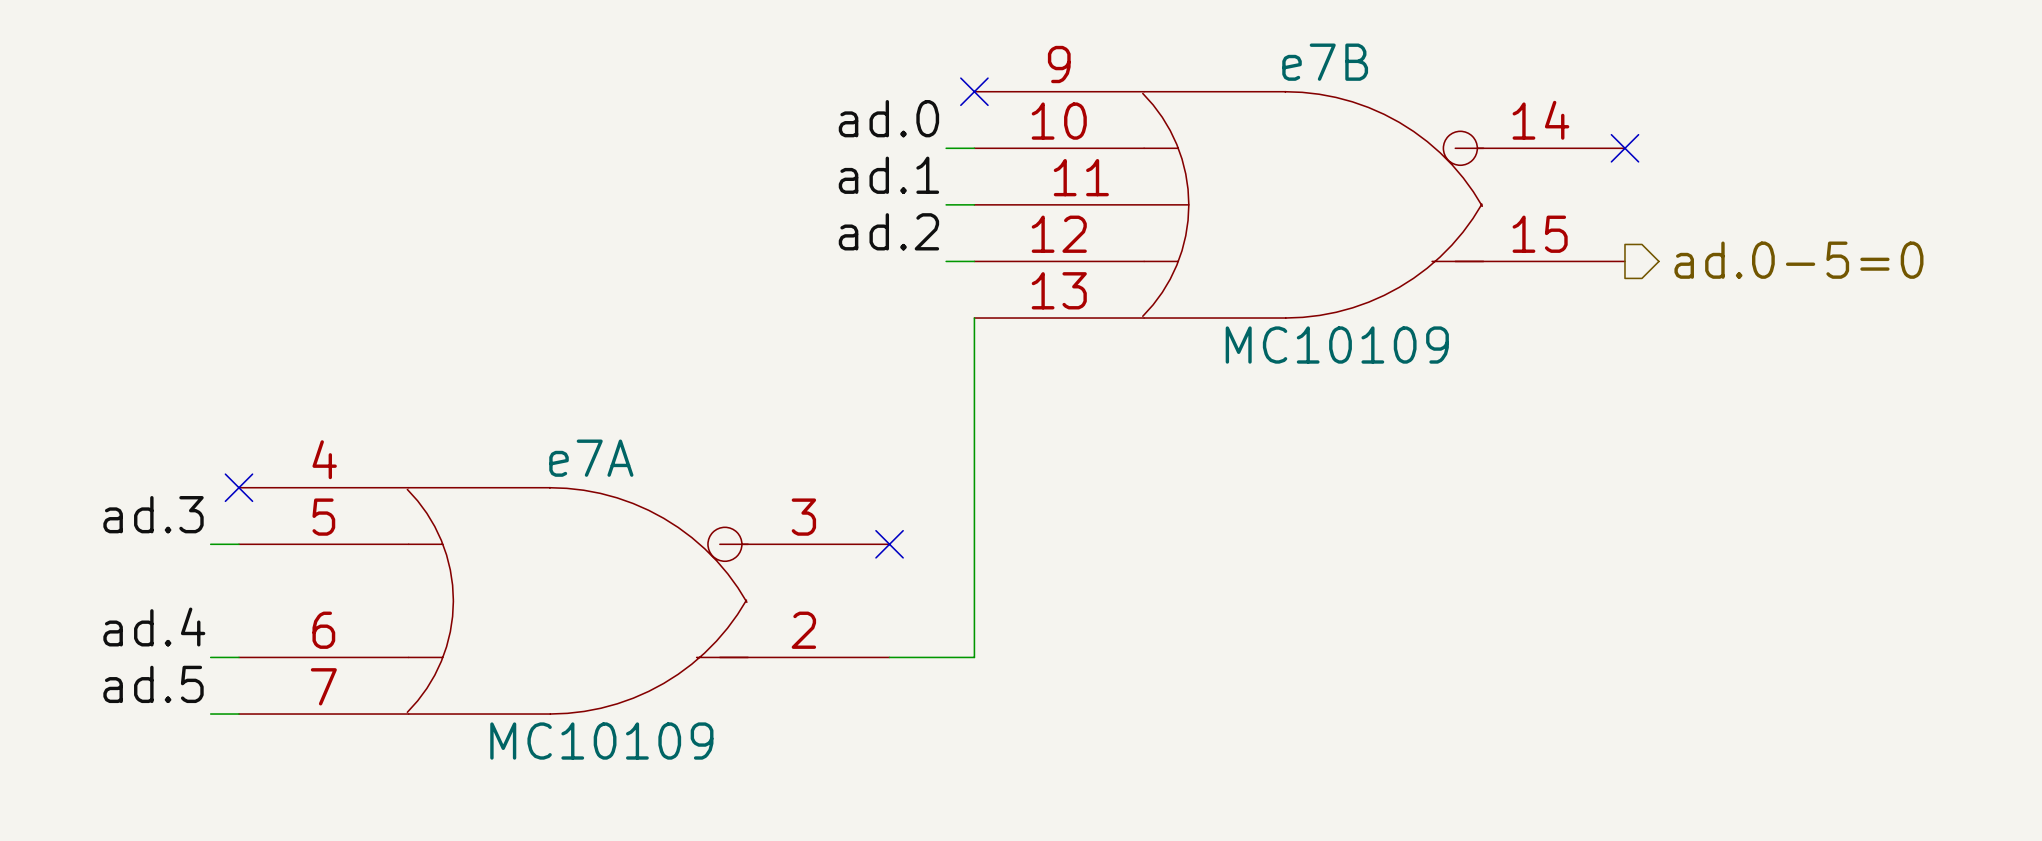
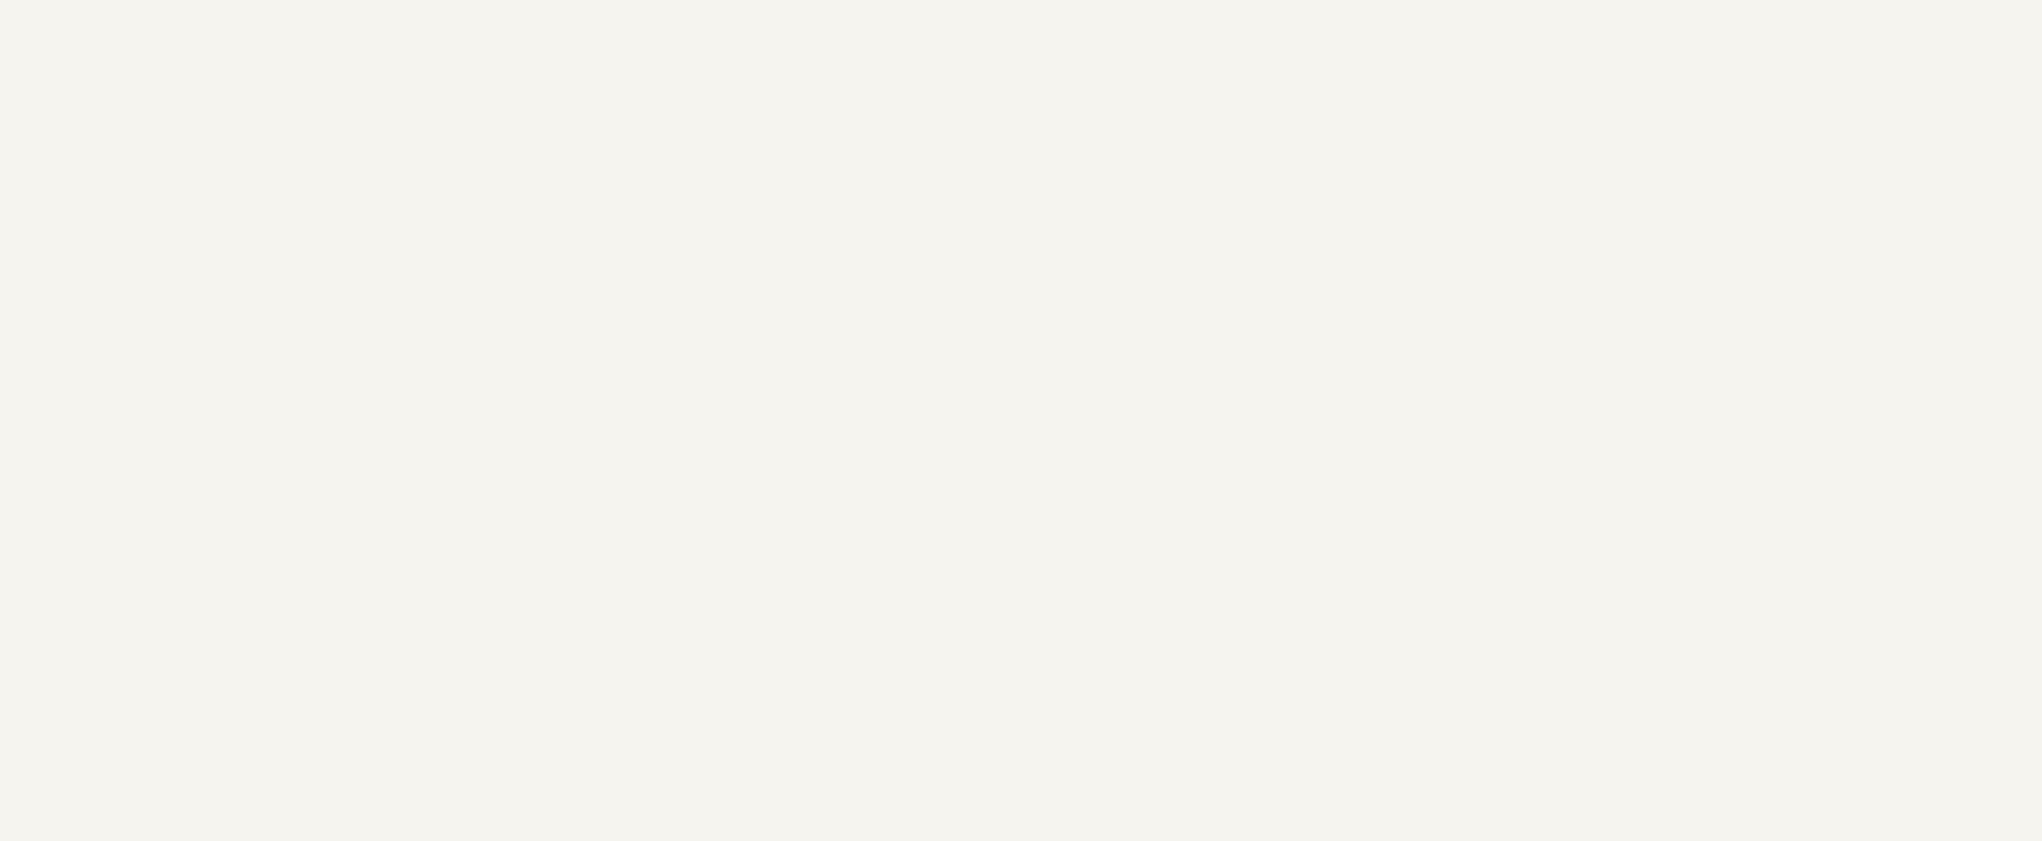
no-connect mark: (974, 91) -> none
label: ad.0 (888, 118) -> none
wire: (946, 148) (974, 148) -> none
no-connect mark: (1624, 148) -> none
label: ad.1 (888, 175) -> none
wire: (946, 204) (974, 204) -> none
e7B: MC10109 (1299, 204) -> none
label: ad.2 (888, 231) -> none
hierarchical label: ad.0-5=0 (1798, 260) -> none
wire: (946, 261) (974, 261) -> none
wire: (974, 318) (974, 657) (889, 657) -> none
no-connect mark: (238, 487) -> none
label: ad.3 (153, 514) -> none
wire: (210, 544) (238, 544) -> none
no-connect mark: (889, 544) -> none
e7A: MC10109 (564, 600) -> none
label: ad.4 (154, 627) -> none
wire: (210, 657) (238, 657) -> none
label: ad.5 (153, 684) -> none
wire: (210, 714) (238, 714) -> none

